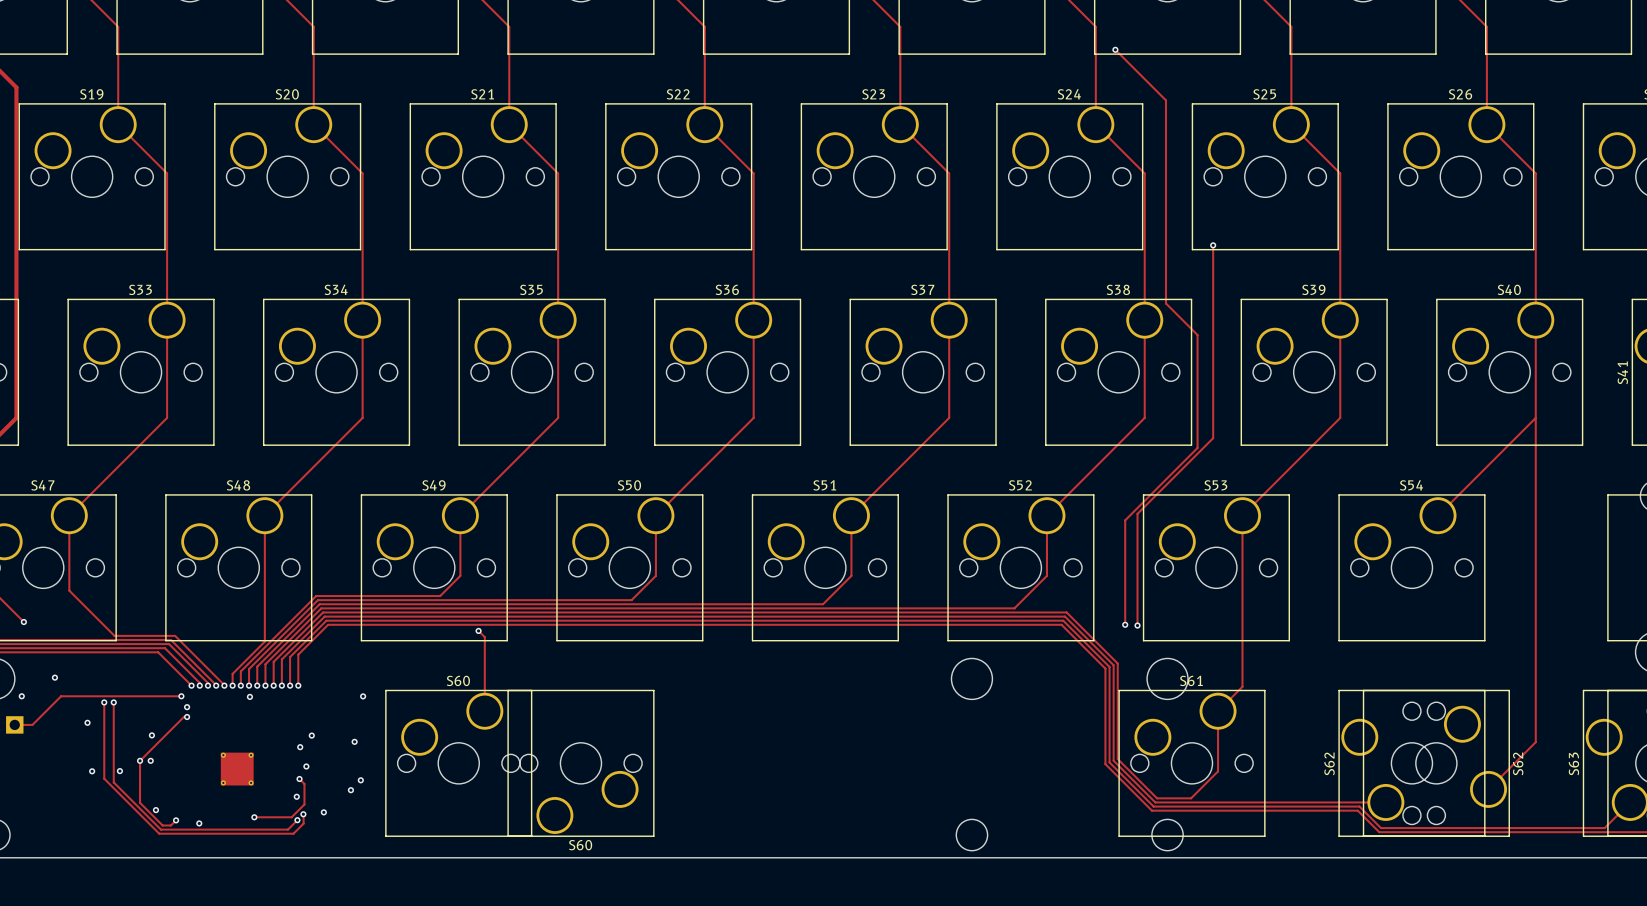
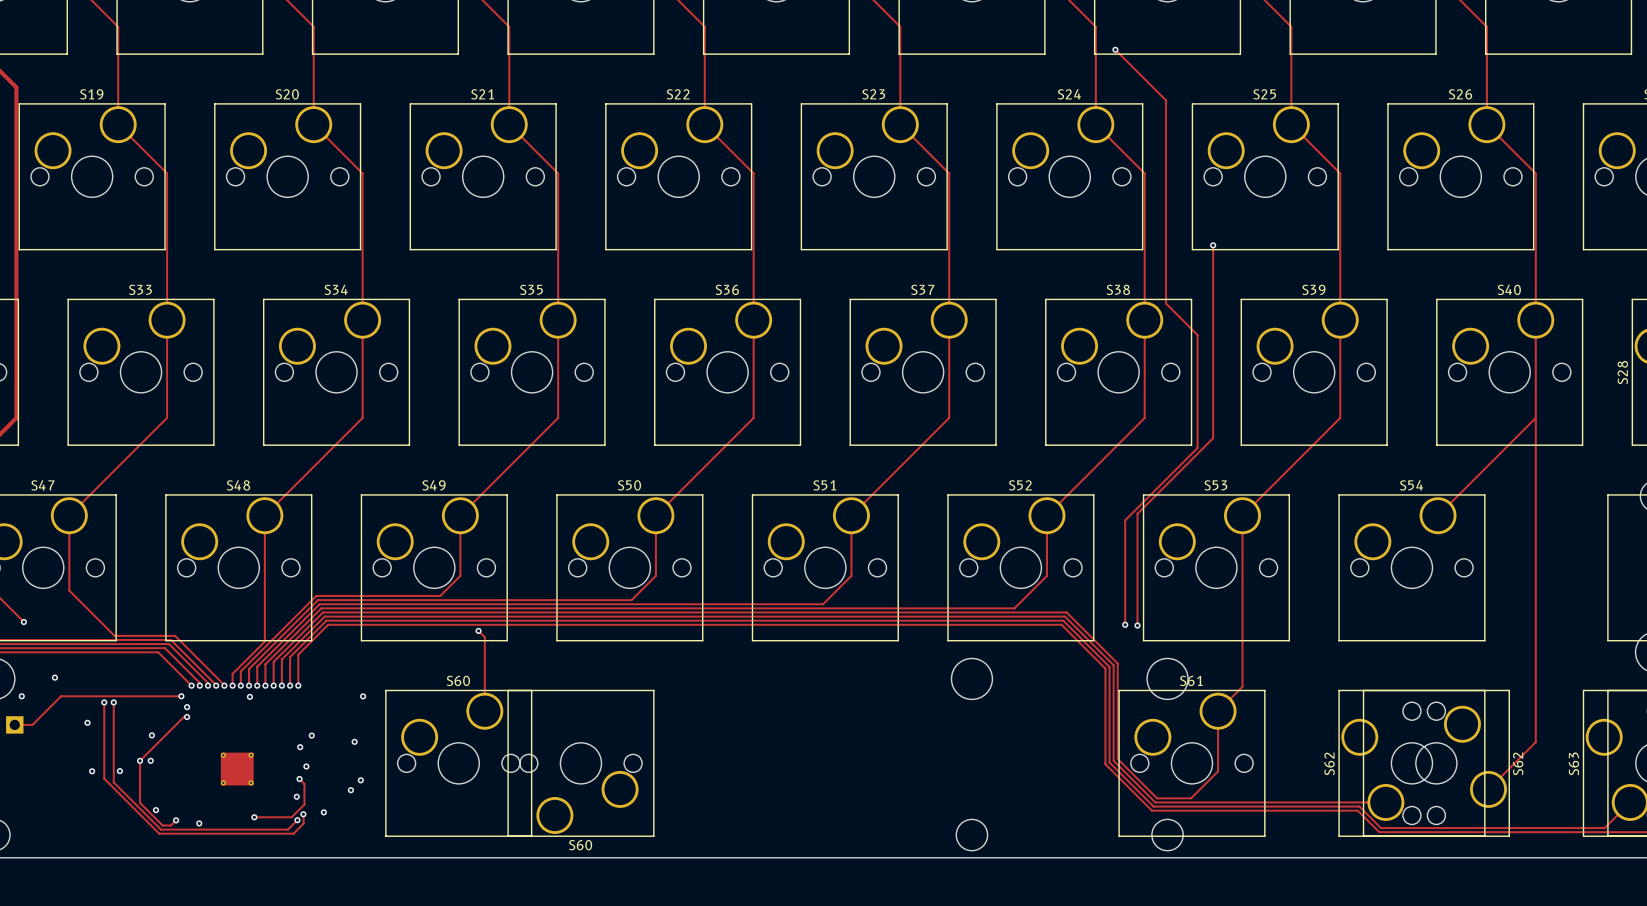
S41 name: S41 (1622, 372) -> S28 (1622, 372)

